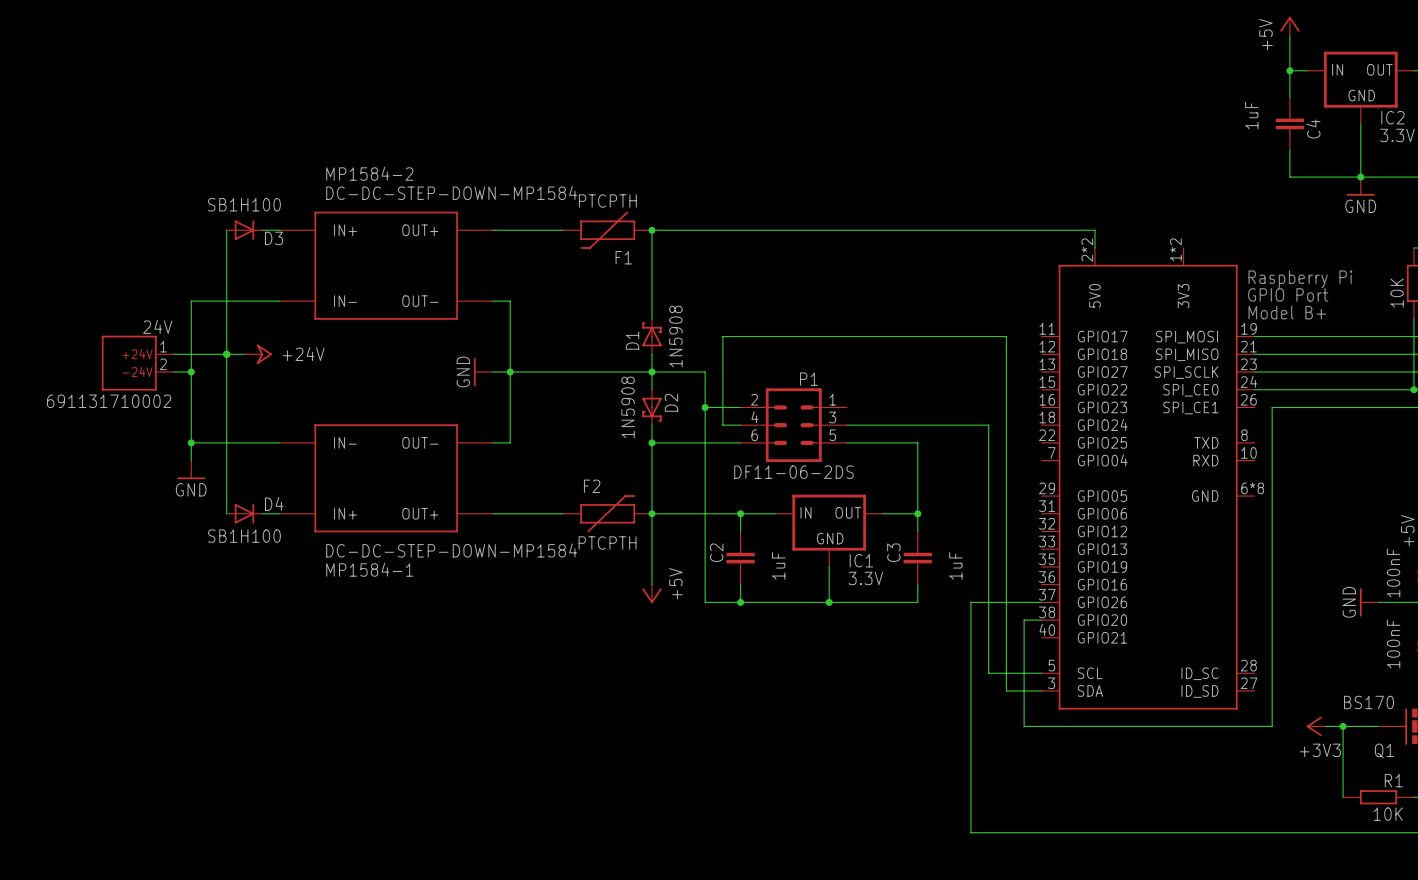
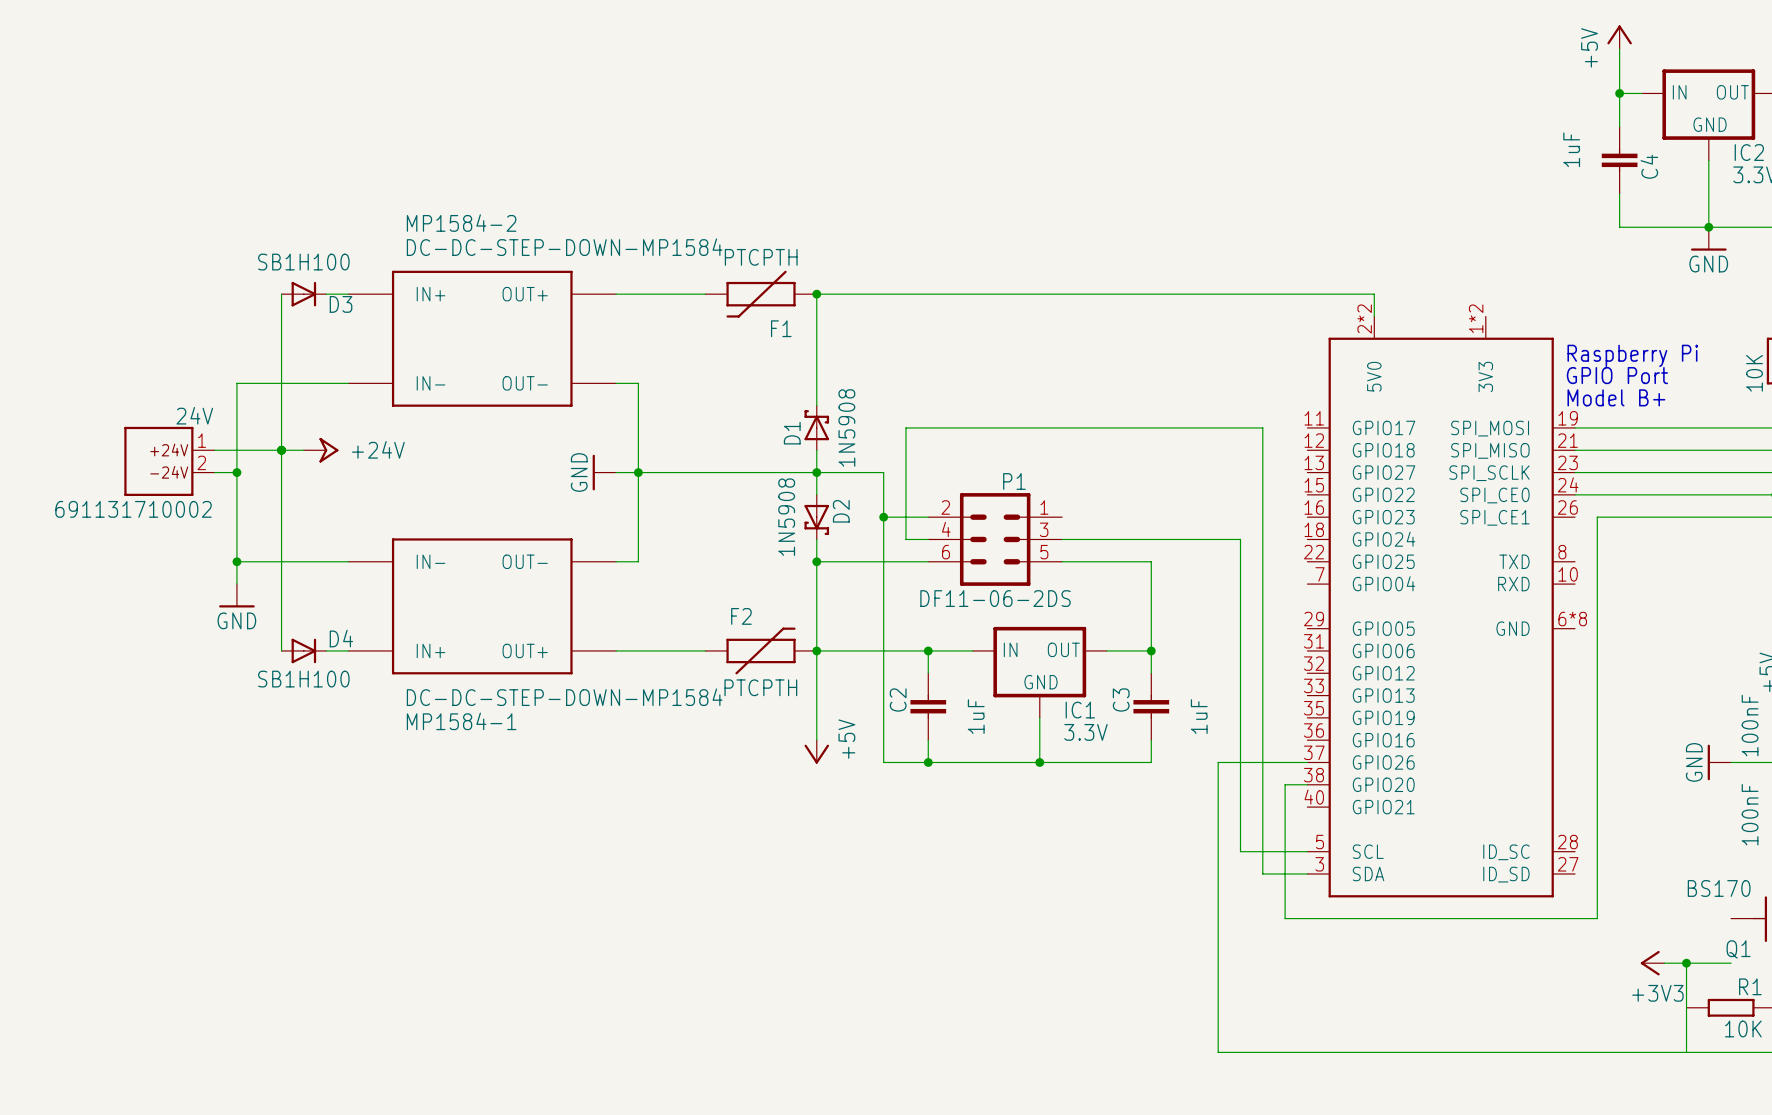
power symbol position: +3V3 (1316, 726) -> +3V3 (1652, 963)
wire: (1325, 726) (1378, 726) -> (1664, 963) (1731, 963)
wire: (1343, 726) (1343, 761) -> (1686, 1007) (1686, 1052)
junction position: (1343, 726) -> (1686, 963)

